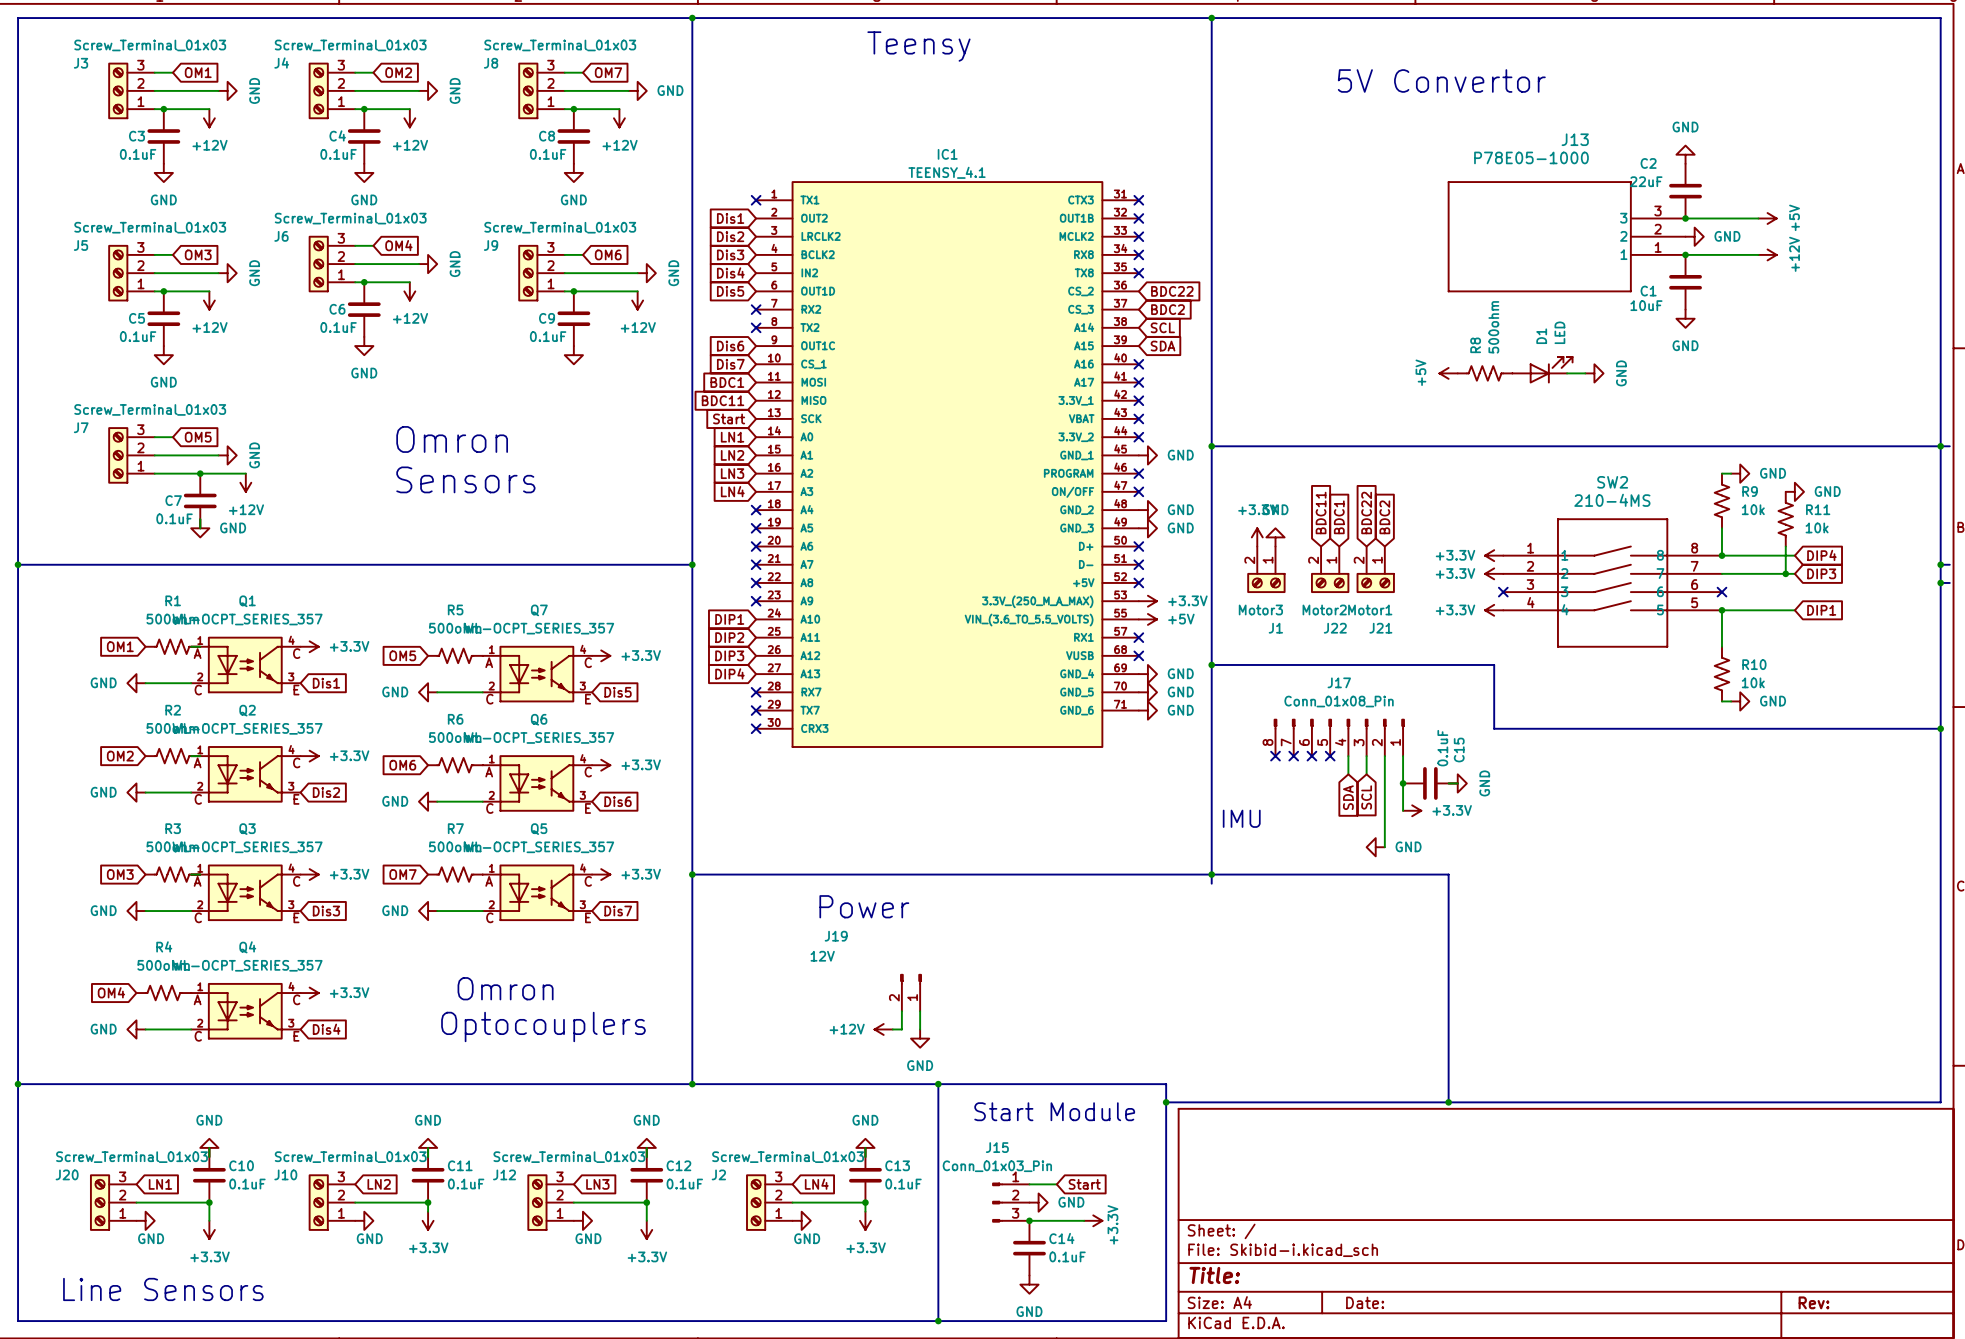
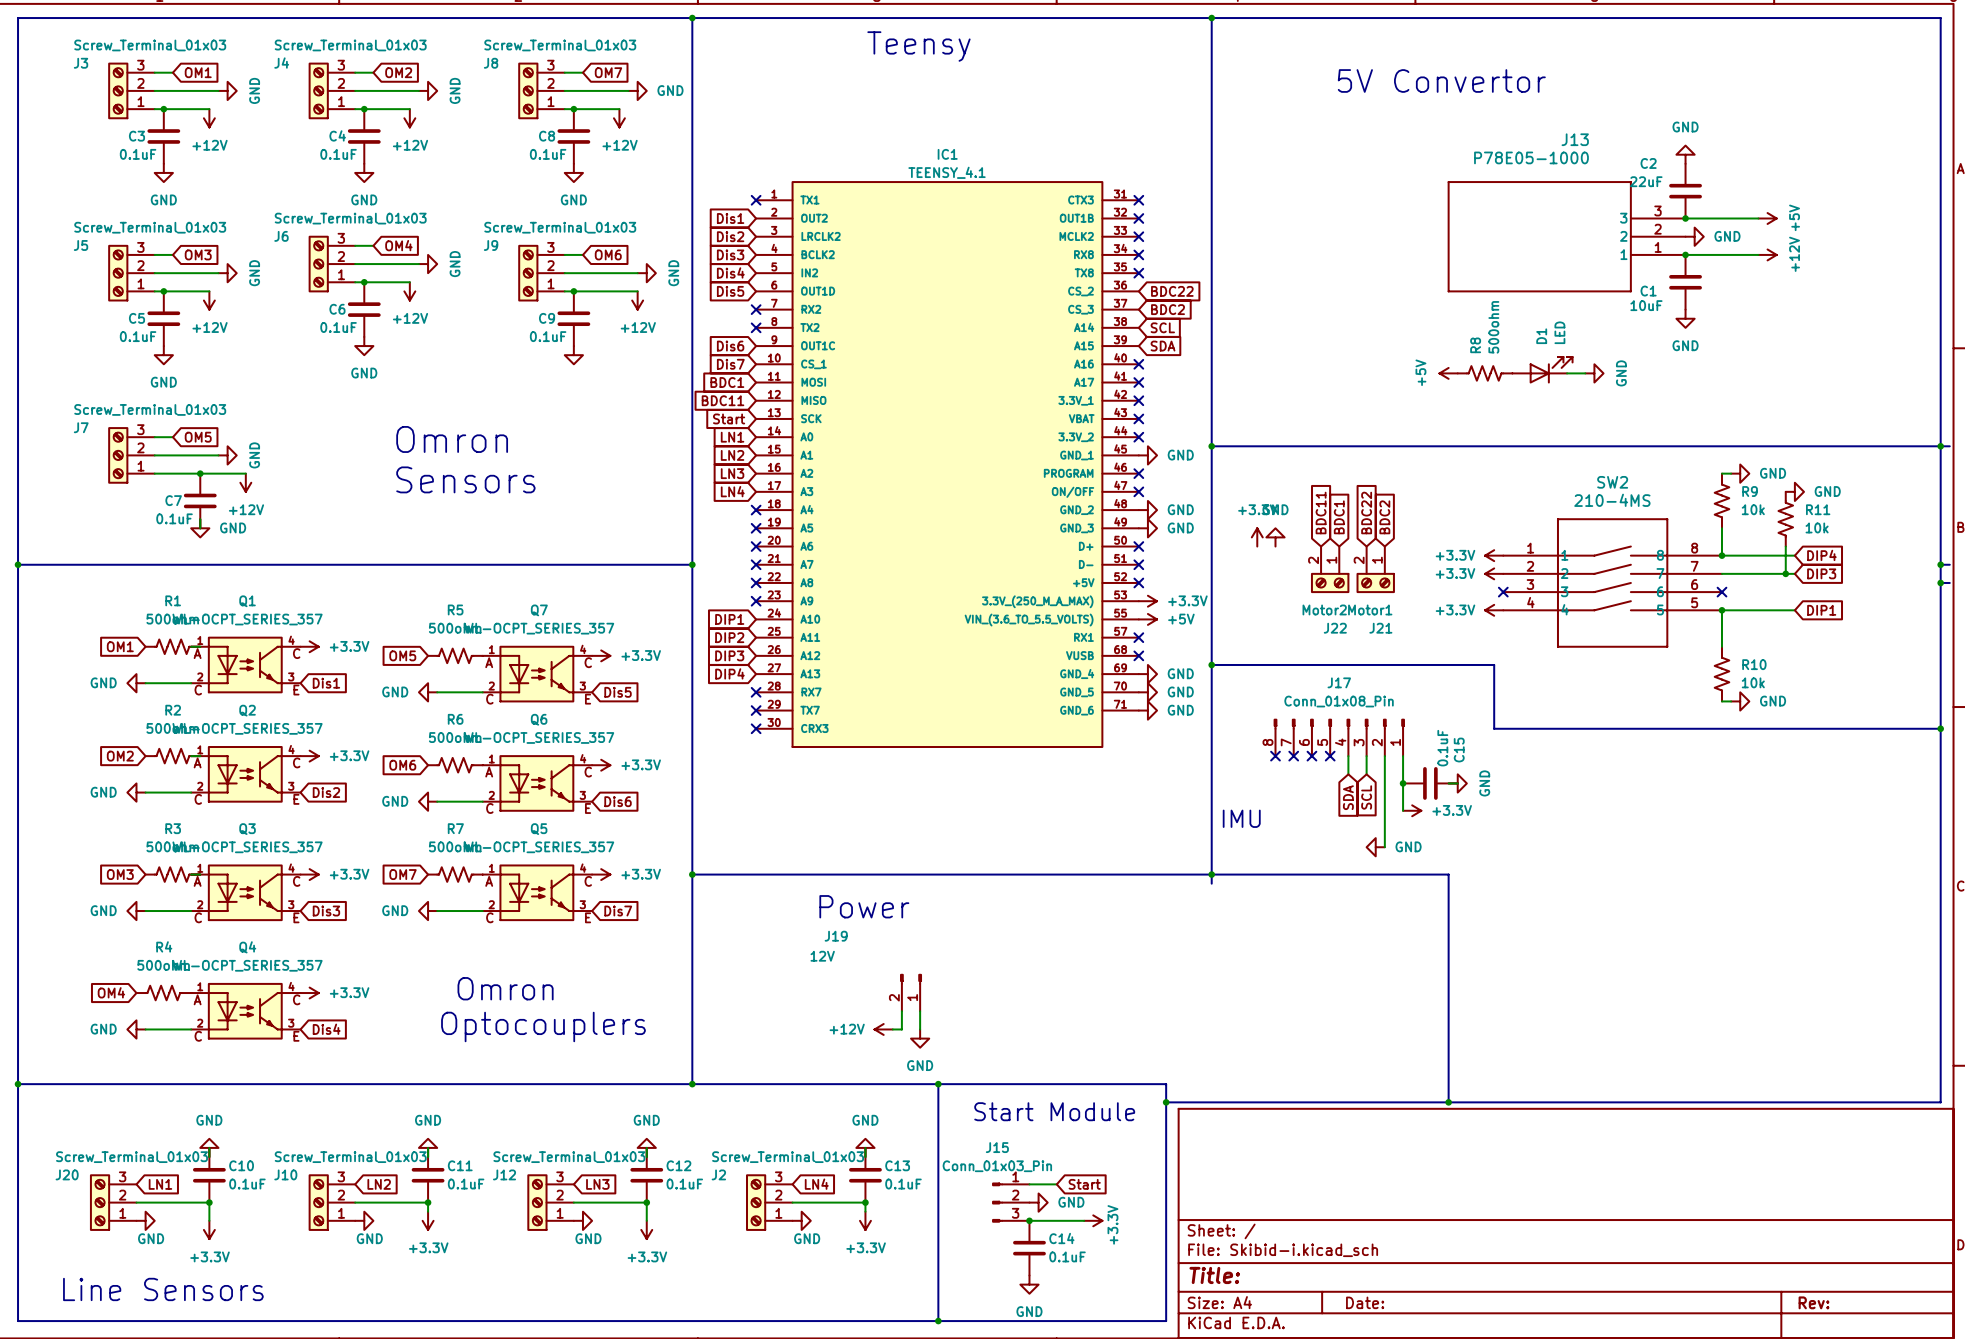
J1: Motor3 (1266, 569) -> none

